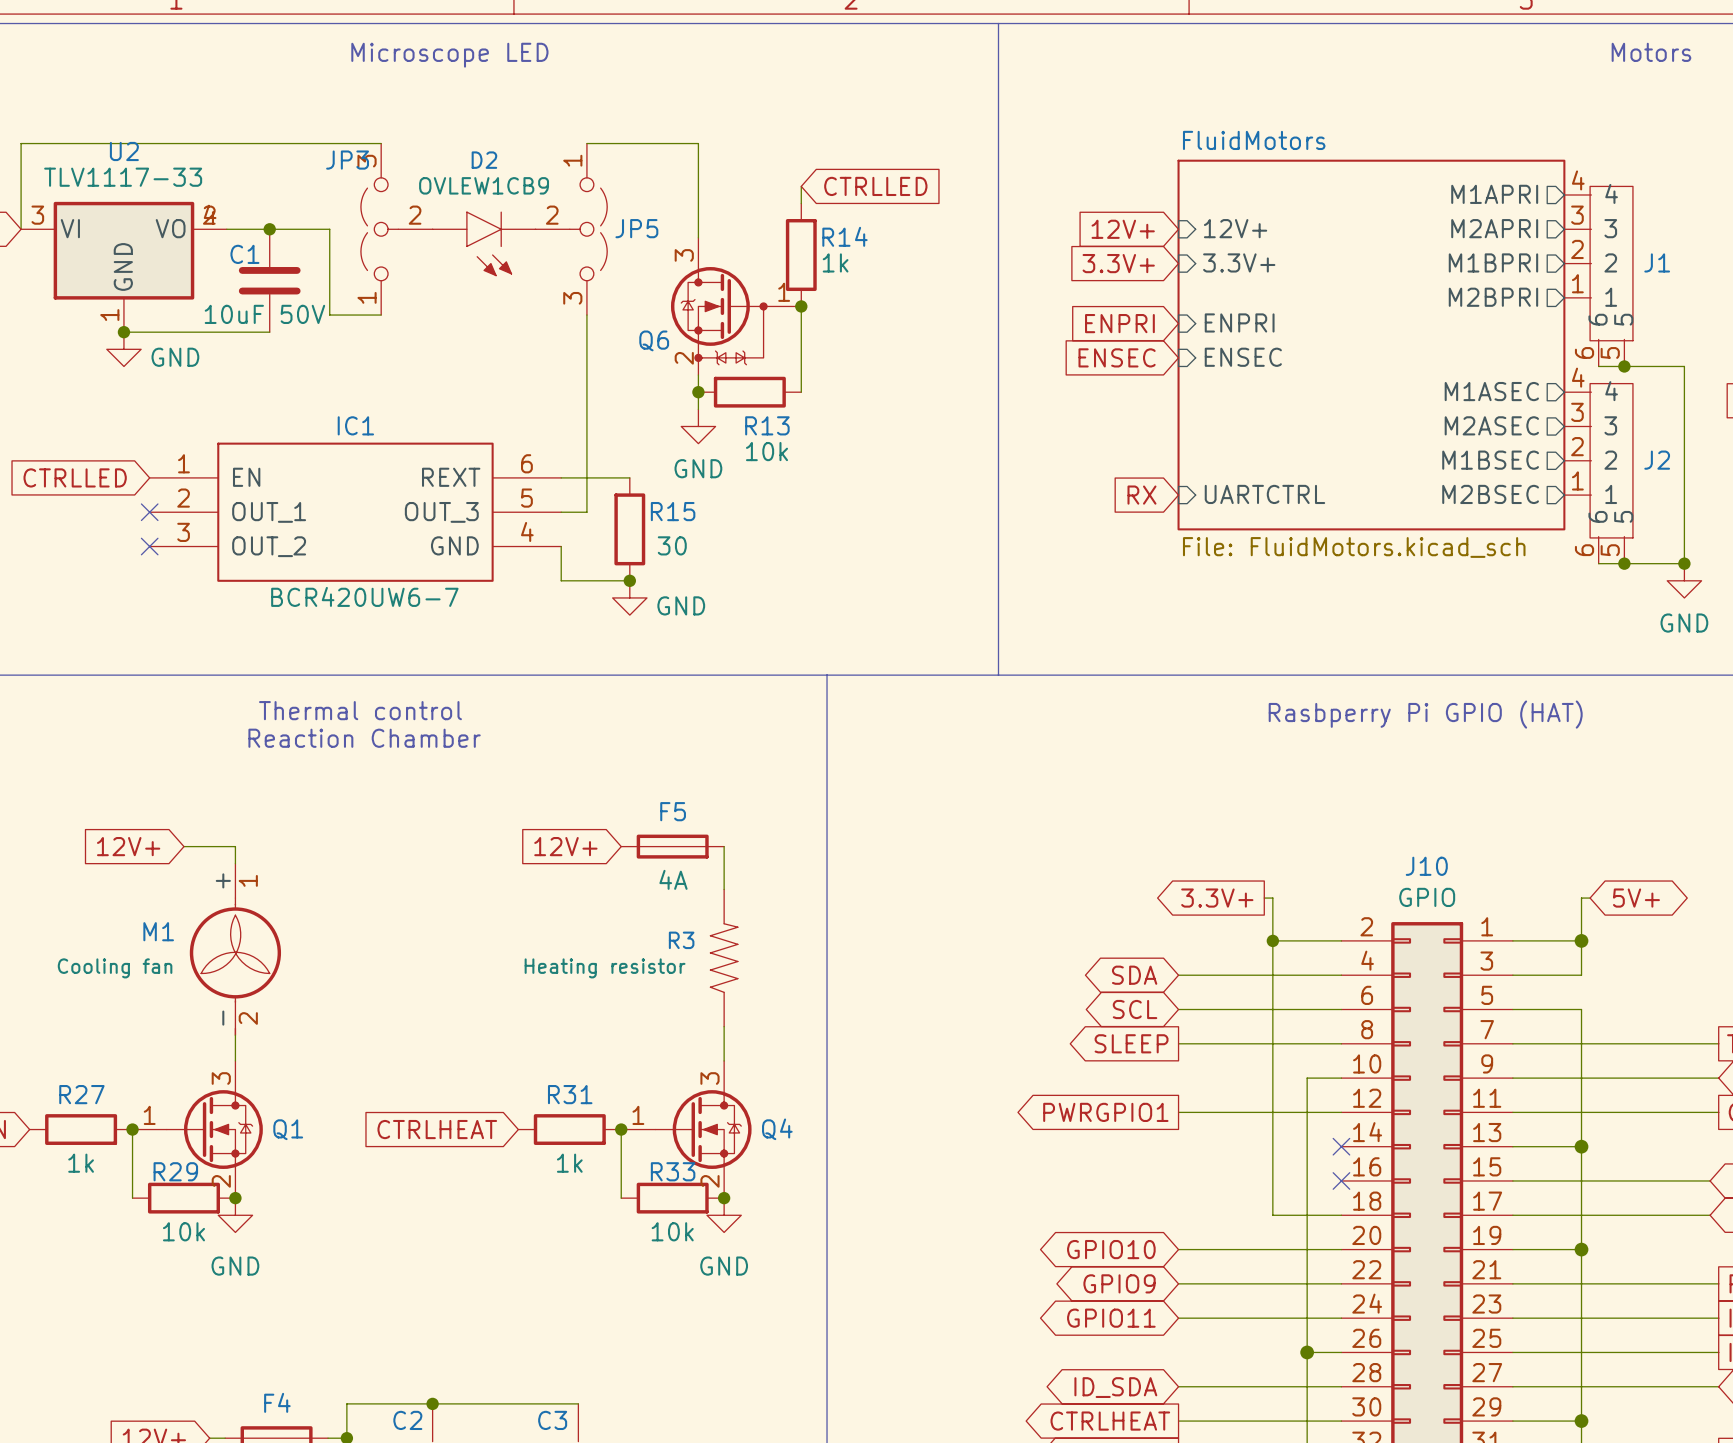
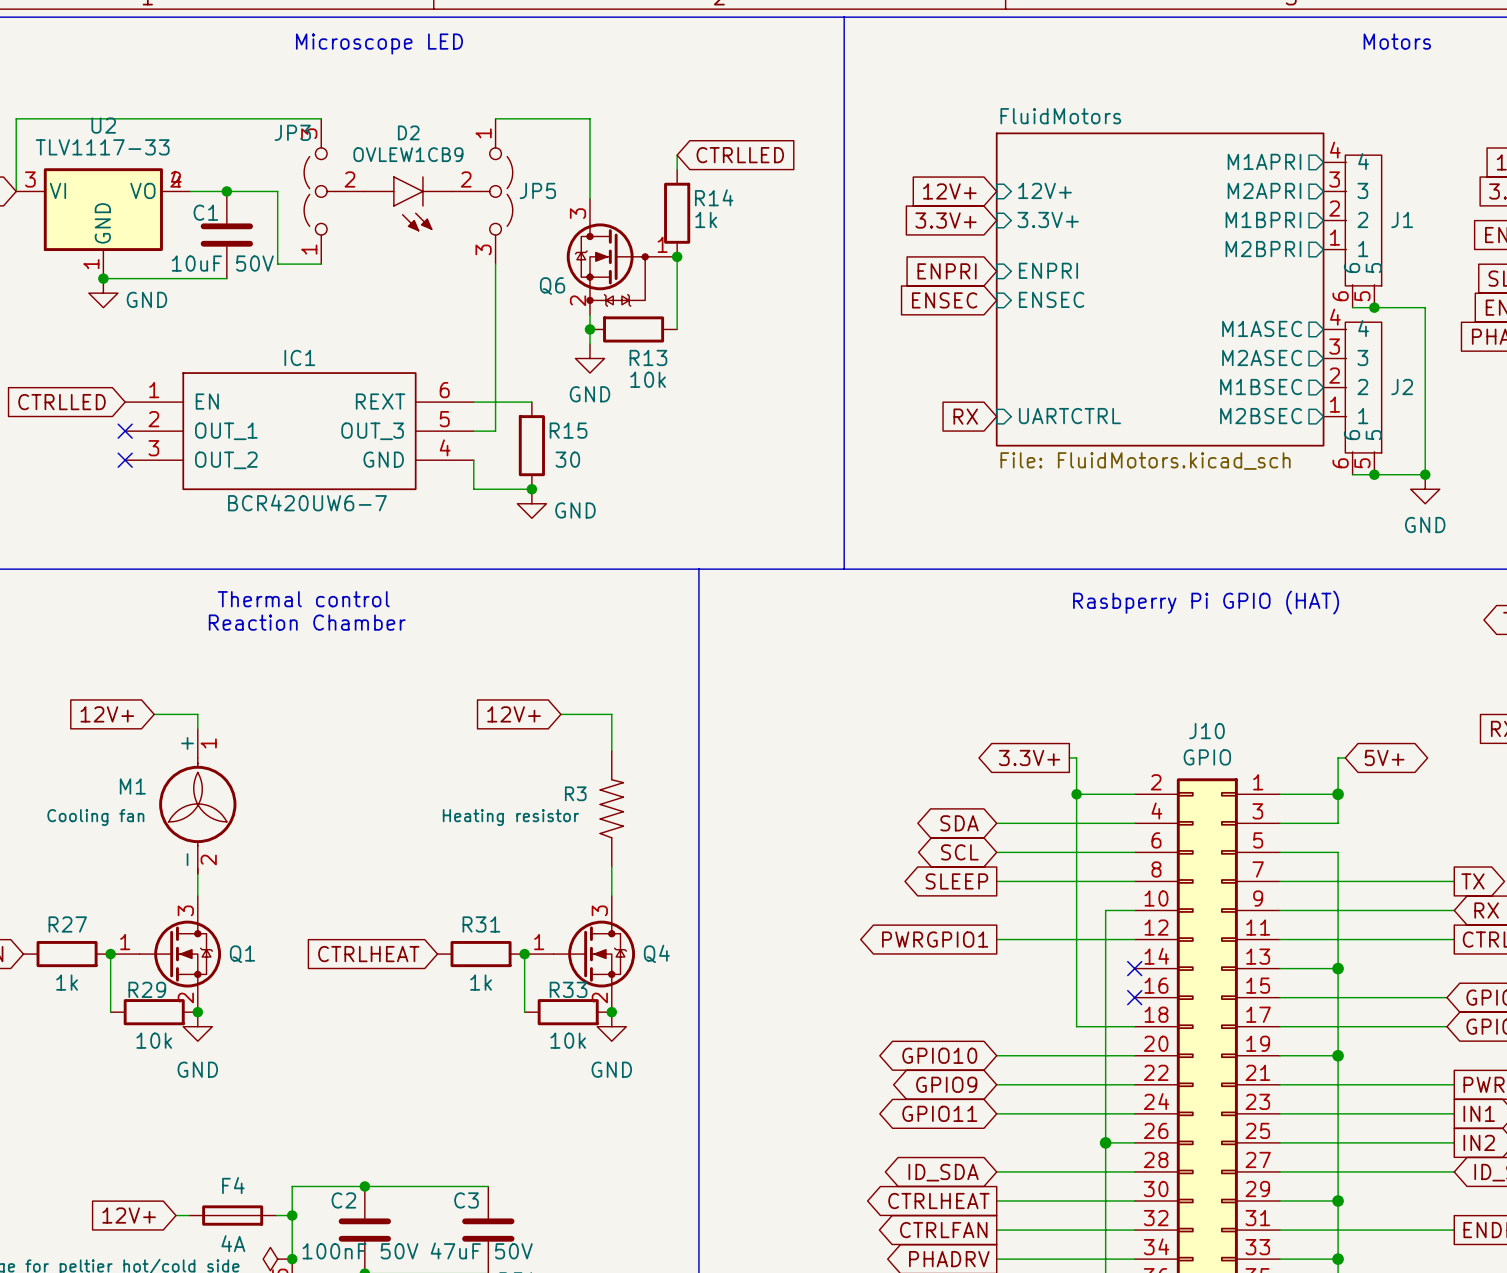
global label position: 12V+ (565, 846) -> 12V+ (514, 714)
F5: 4A (672, 846) -> none

